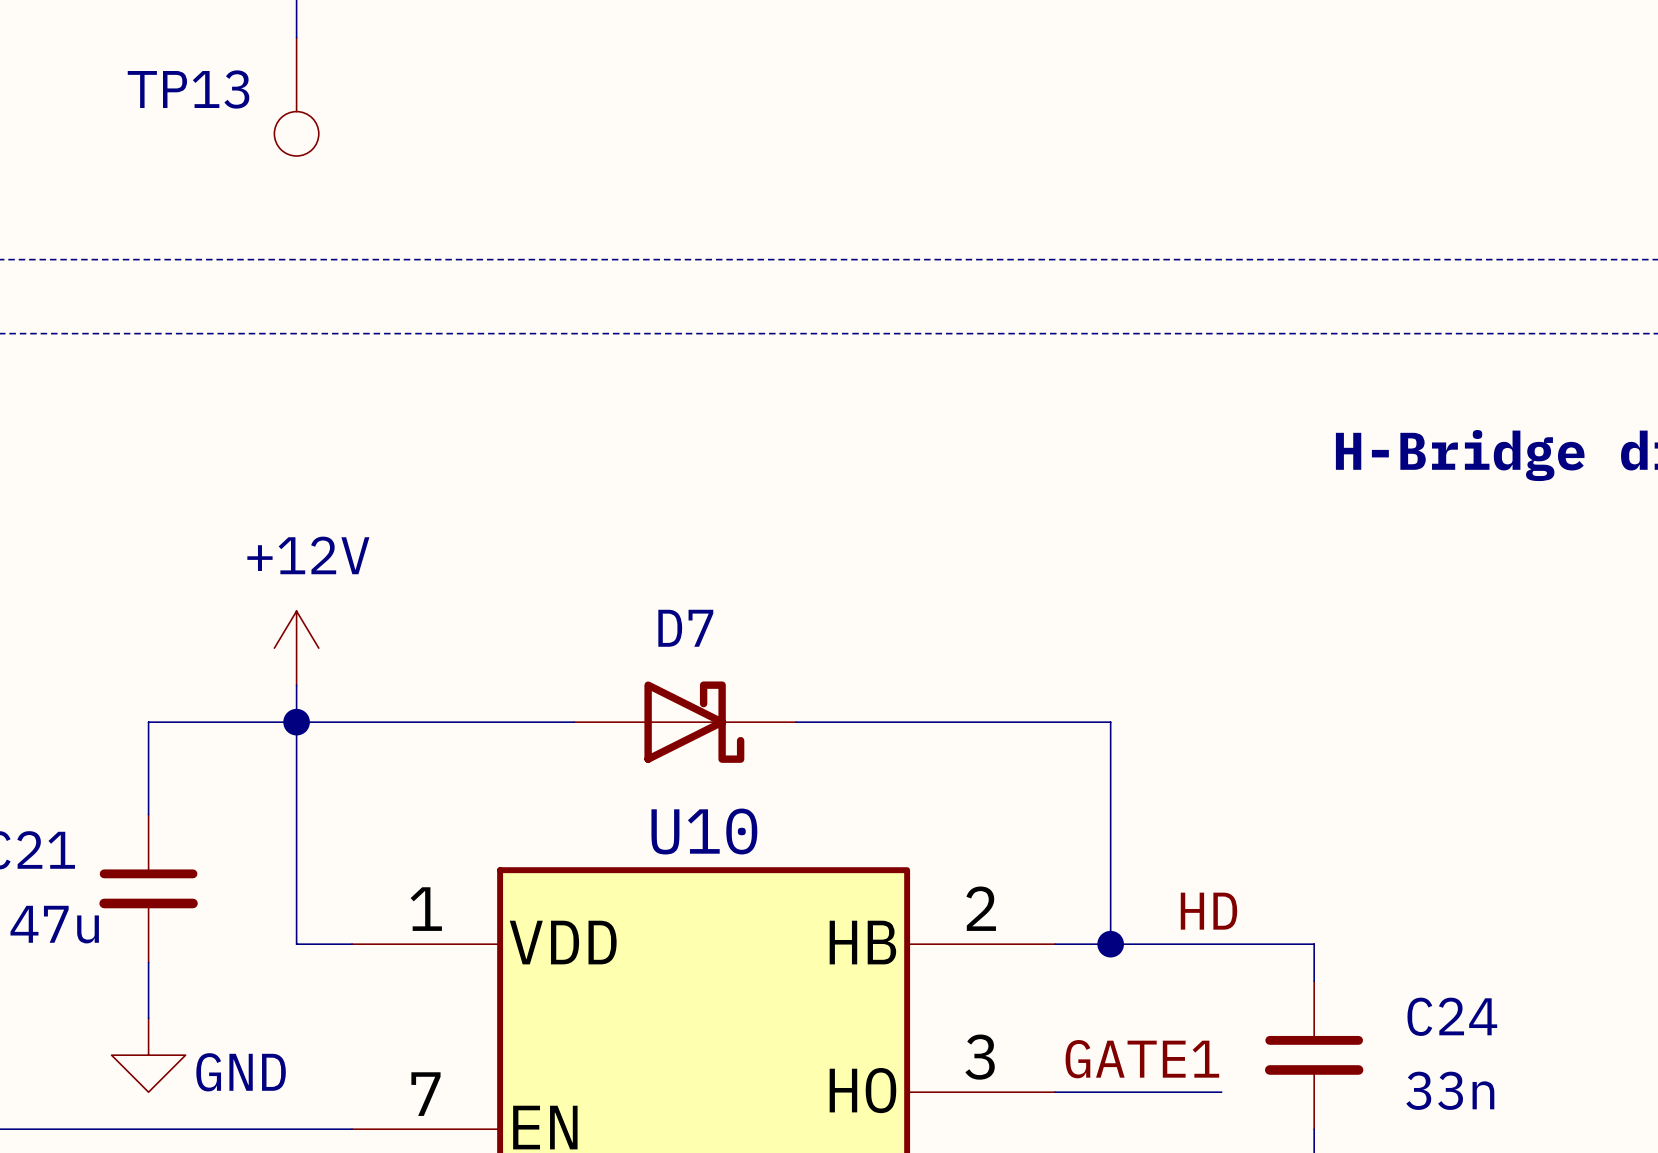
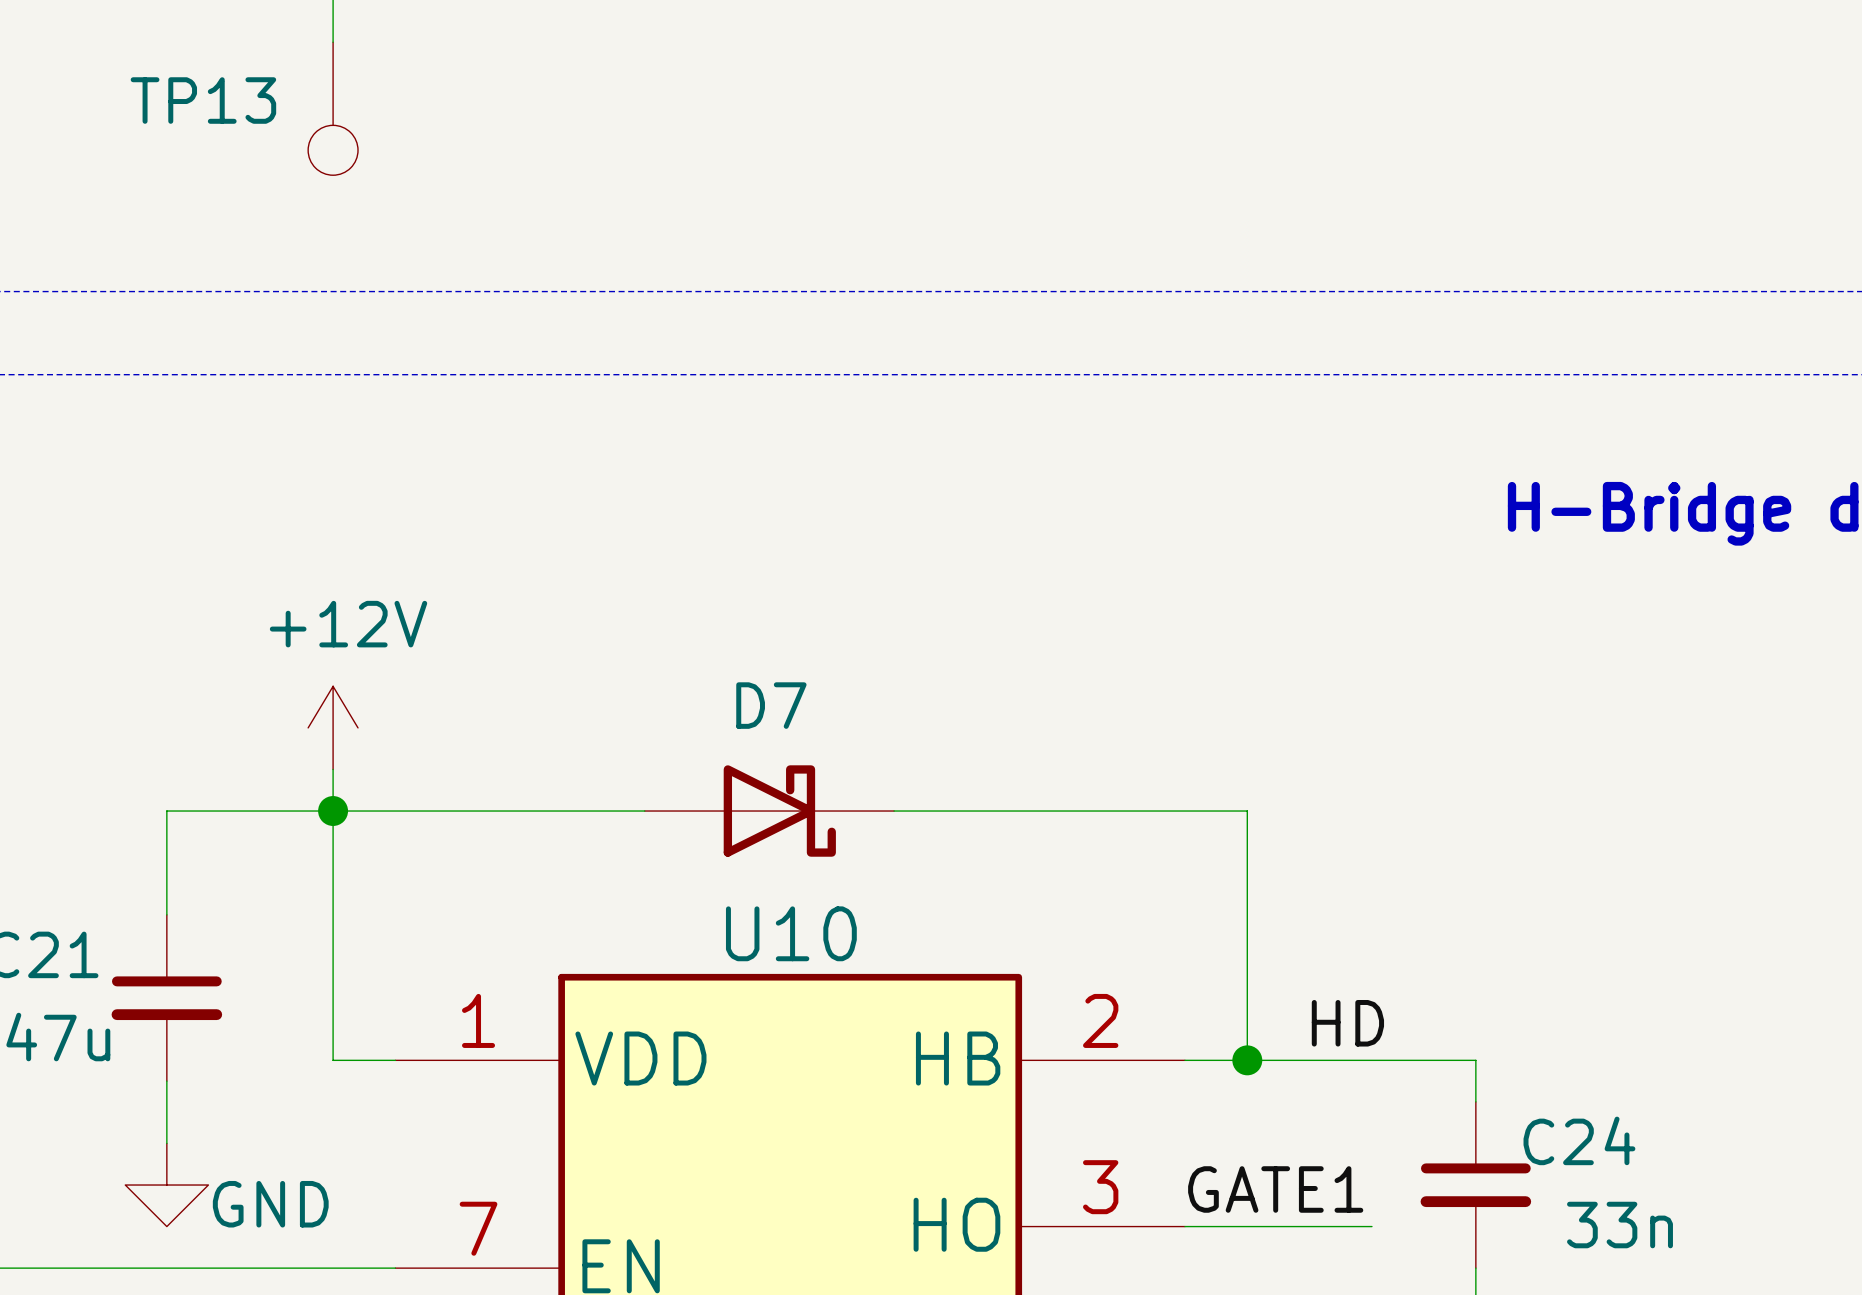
C24 name position: C24 (1452, 1016) -> C24 (1579, 1140)

